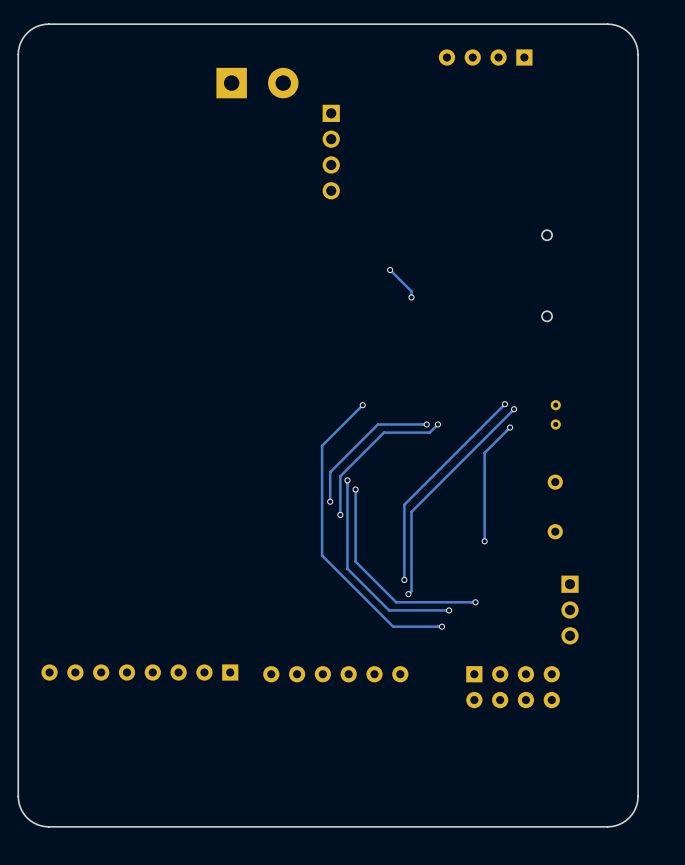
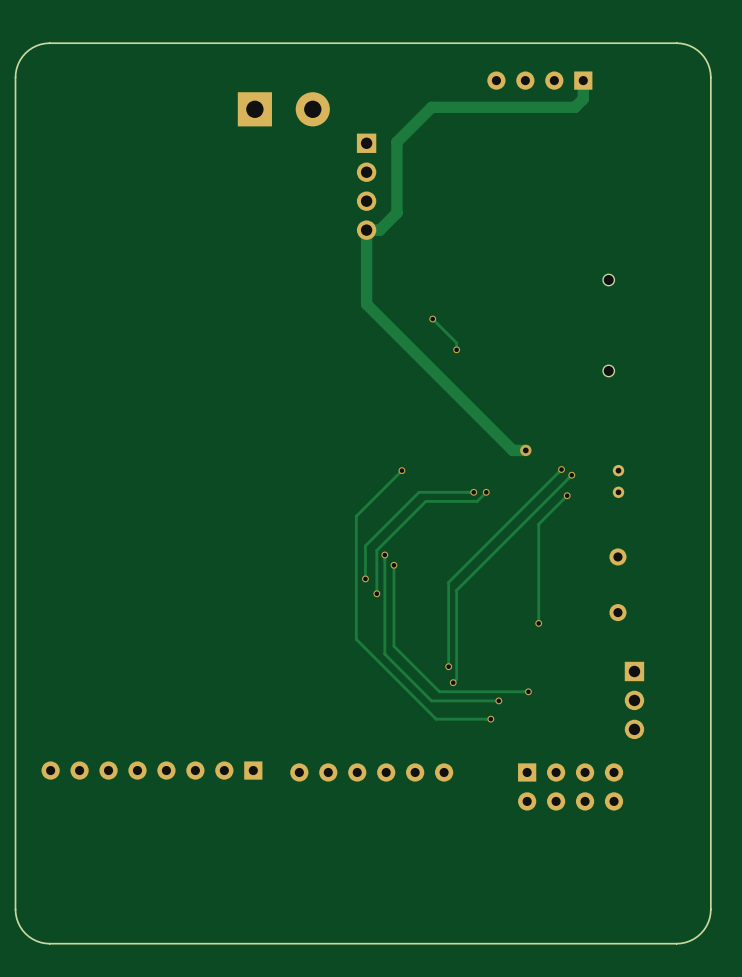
track: none -> (583, 80) (583, 99) (575, 107) (431, 107) (396, 142) (396, 213) (379, 230) (366, 230) (366, 304) (512, 450) (525, 450)
via: none -> (525, 450)

